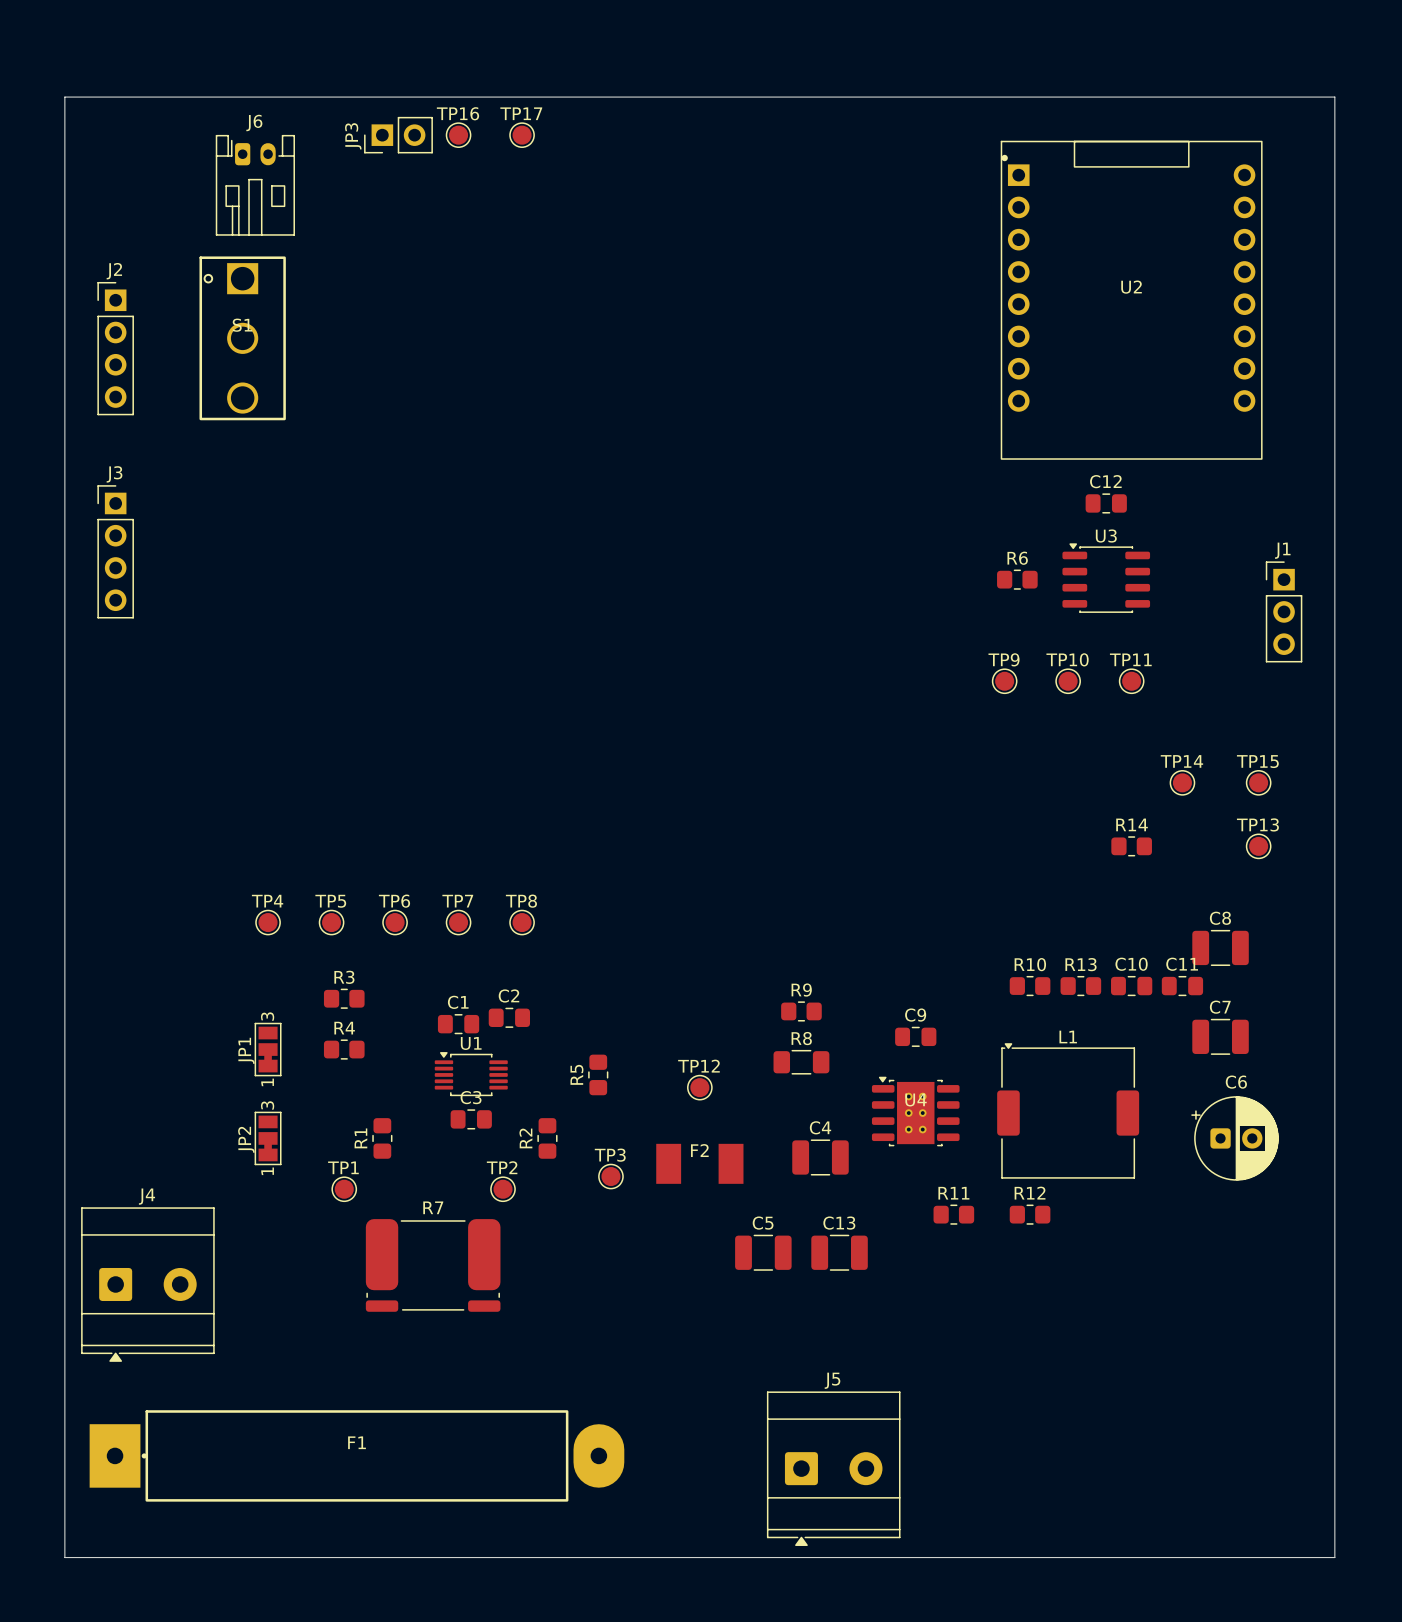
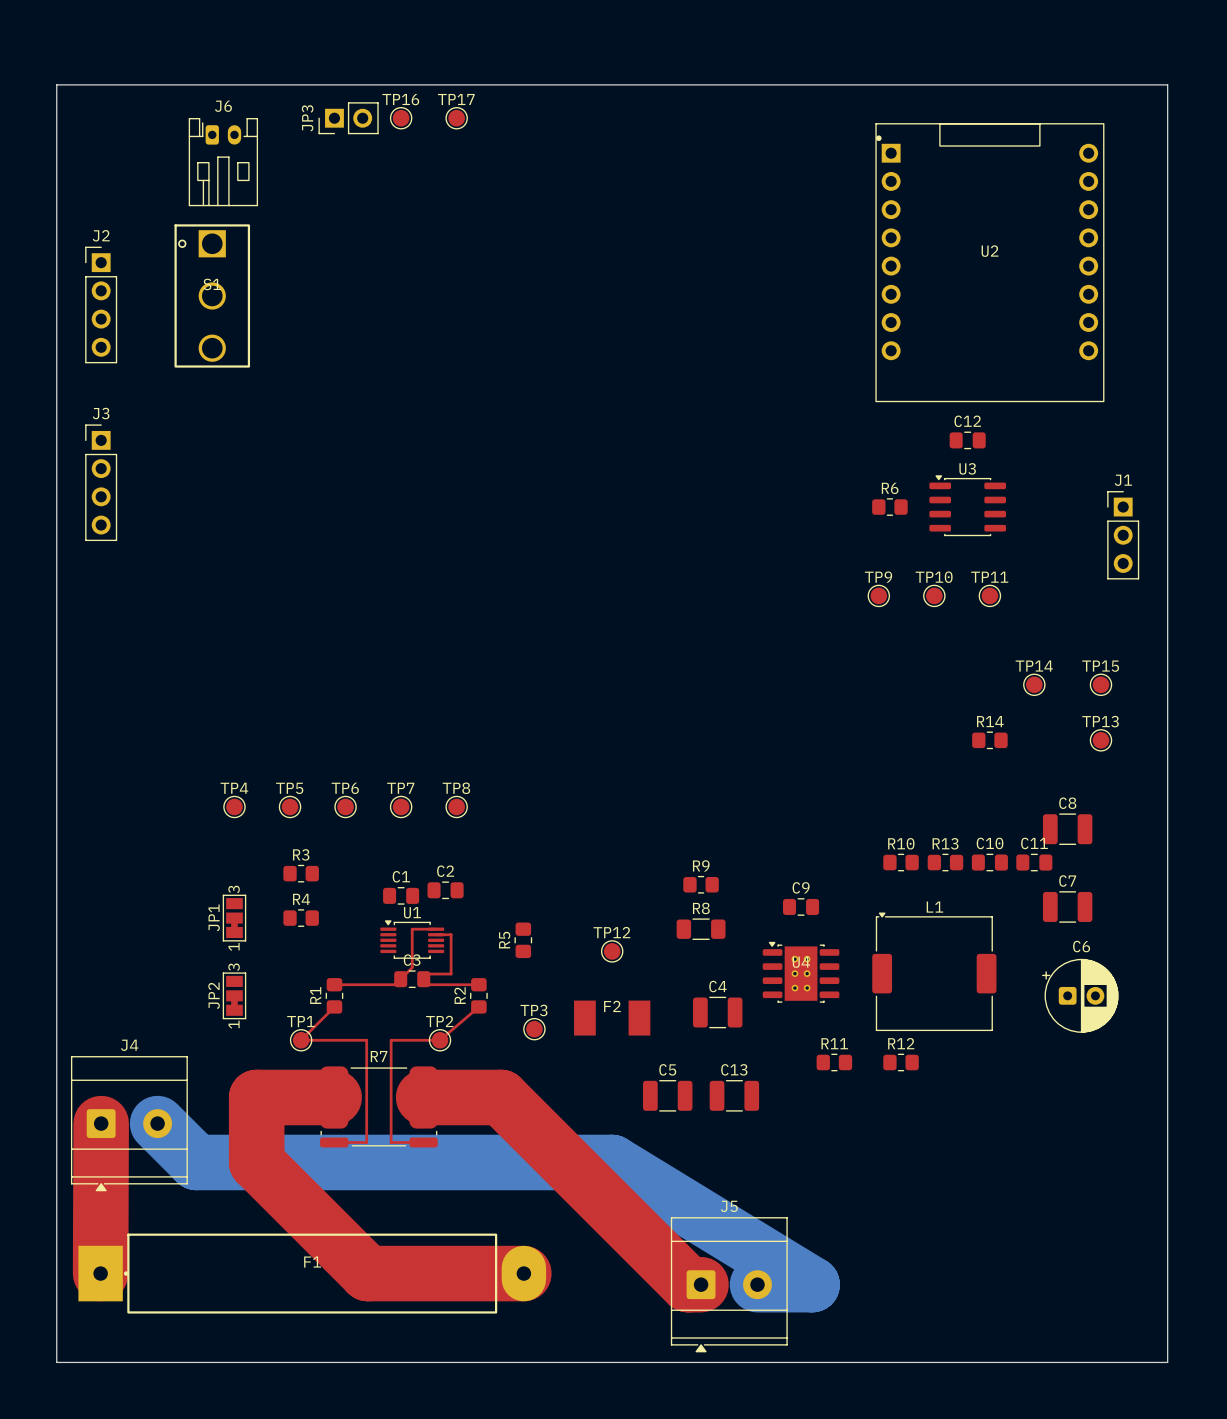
top track: none -> (436, 929) (412, 929) (412, 967) (395, 984) (334, 984)
top track: none -> (436, 934) (451, 934) (451, 974) (428, 974) (423, 979) (429, 984) (478, 984)
top track: none -> (334, 1006) (301, 1040) (366, 1040) (366, 1142) (334, 1142)
top track: none -> (478, 1006) (440, 1040) (391, 1040) (391, 1142) (423, 1142)
top track: none -> (334, 1097) (256, 1097) (256, 1162) (367, 1273) (523, 1273)
top track: none -> (423, 1097) (501, 1097) (688, 1284) (701, 1284)
top track: none -> (101, 1123) (100, 1273)
bottom track: none -> (157, 1123) (196, 1162) (612, 1162) (812, 1284) (757, 1284)

